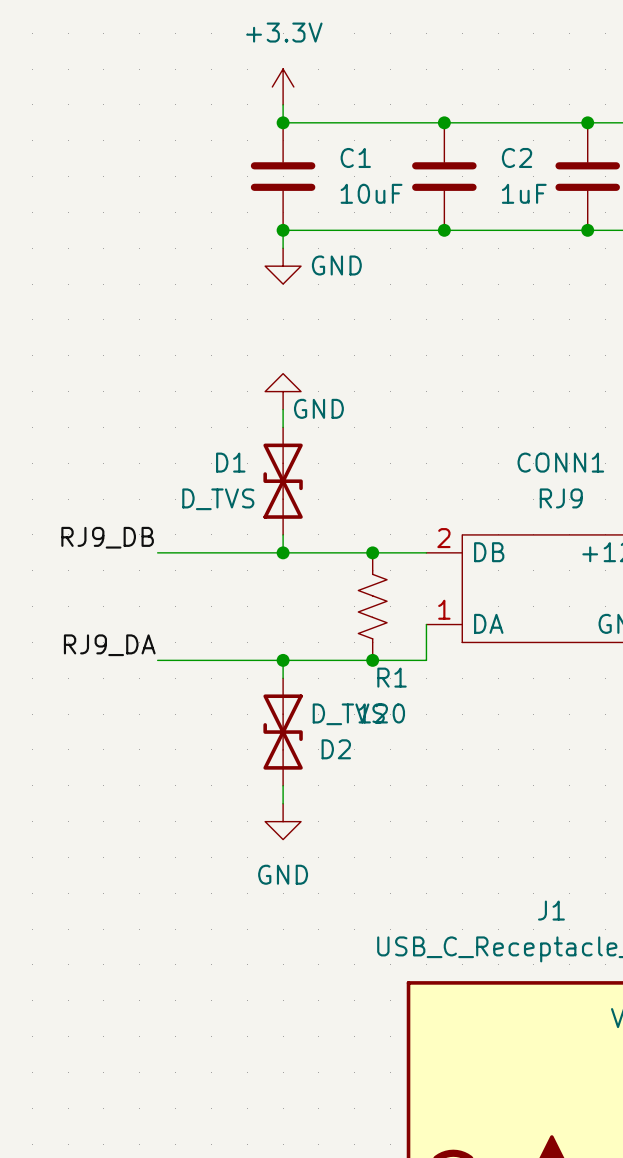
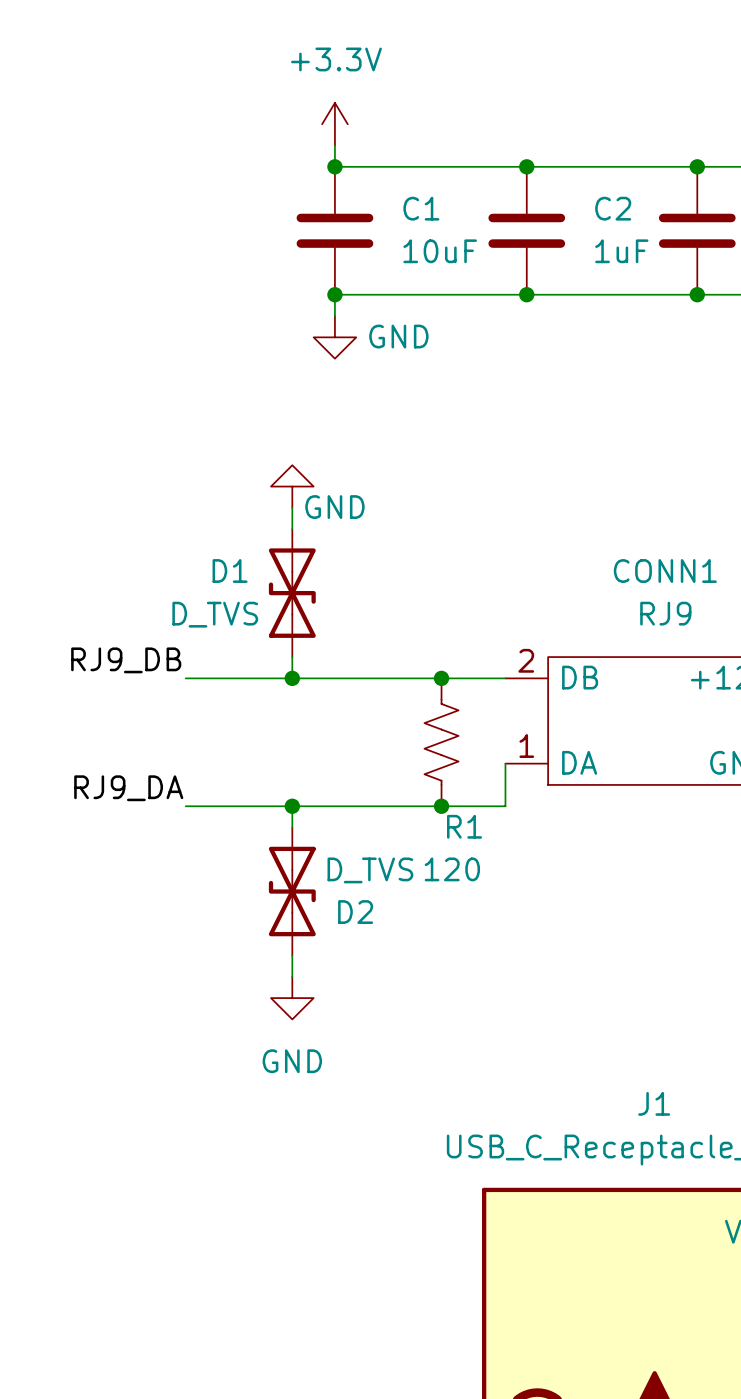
power symbol position: GND (283, 391) -> GND (292, 486)
wire: (283, 409) (283, 427) -> (292, 507) (292, 529)
D1 position: (283, 481) -> (292, 593)
wire: (283, 534) (283, 552) -> (292, 657) (292, 678)
junction position: (283, 552) -> (292, 678)
wire: (283, 660) (283, 678) -> (292, 806) (292, 827)
junction position: (283, 660) -> (292, 806)
D2 position: (283, 732) -> (292, 891)
wire: (283, 785) (283, 803) -> (292, 955) (292, 976)
power symbol position: GND (283, 821) -> GND (292, 998)

